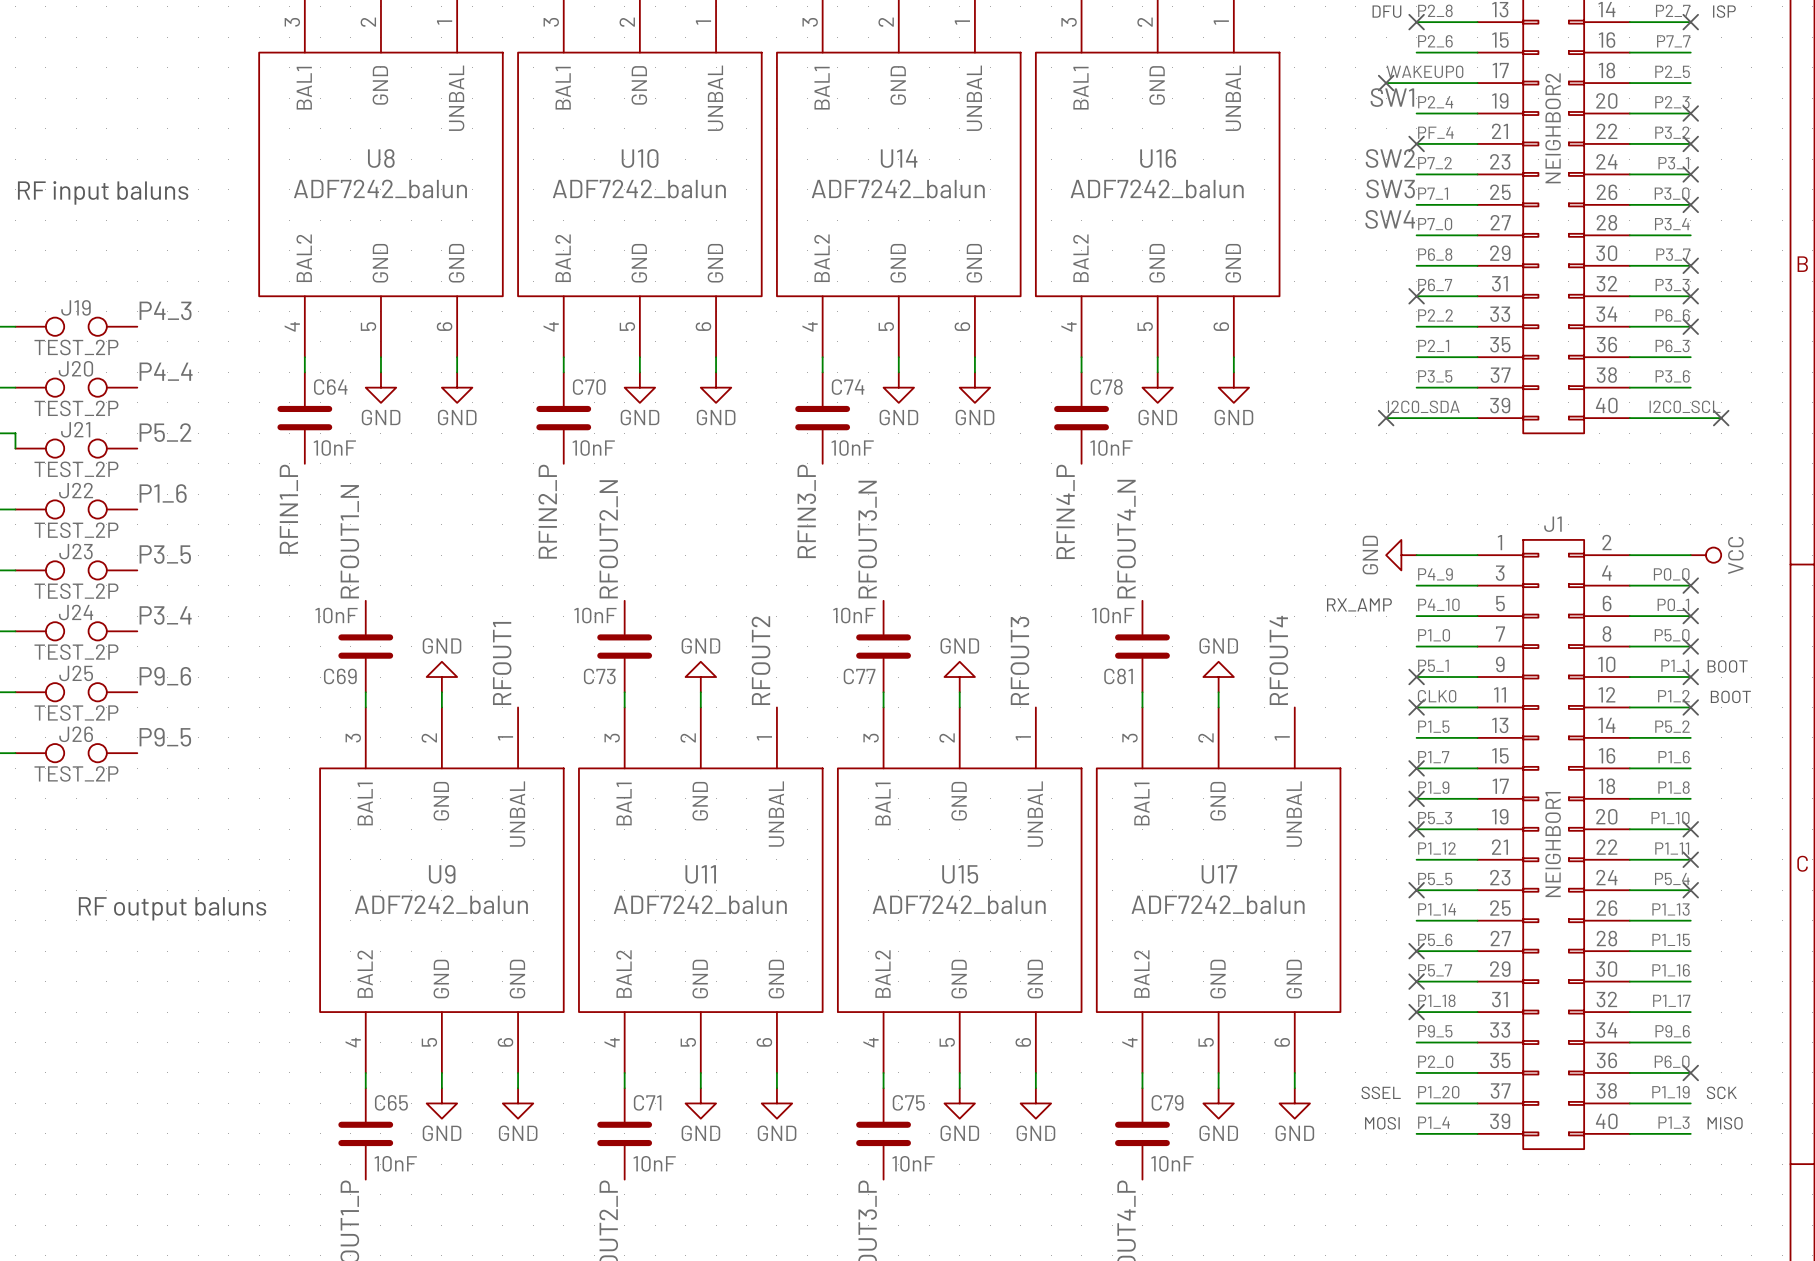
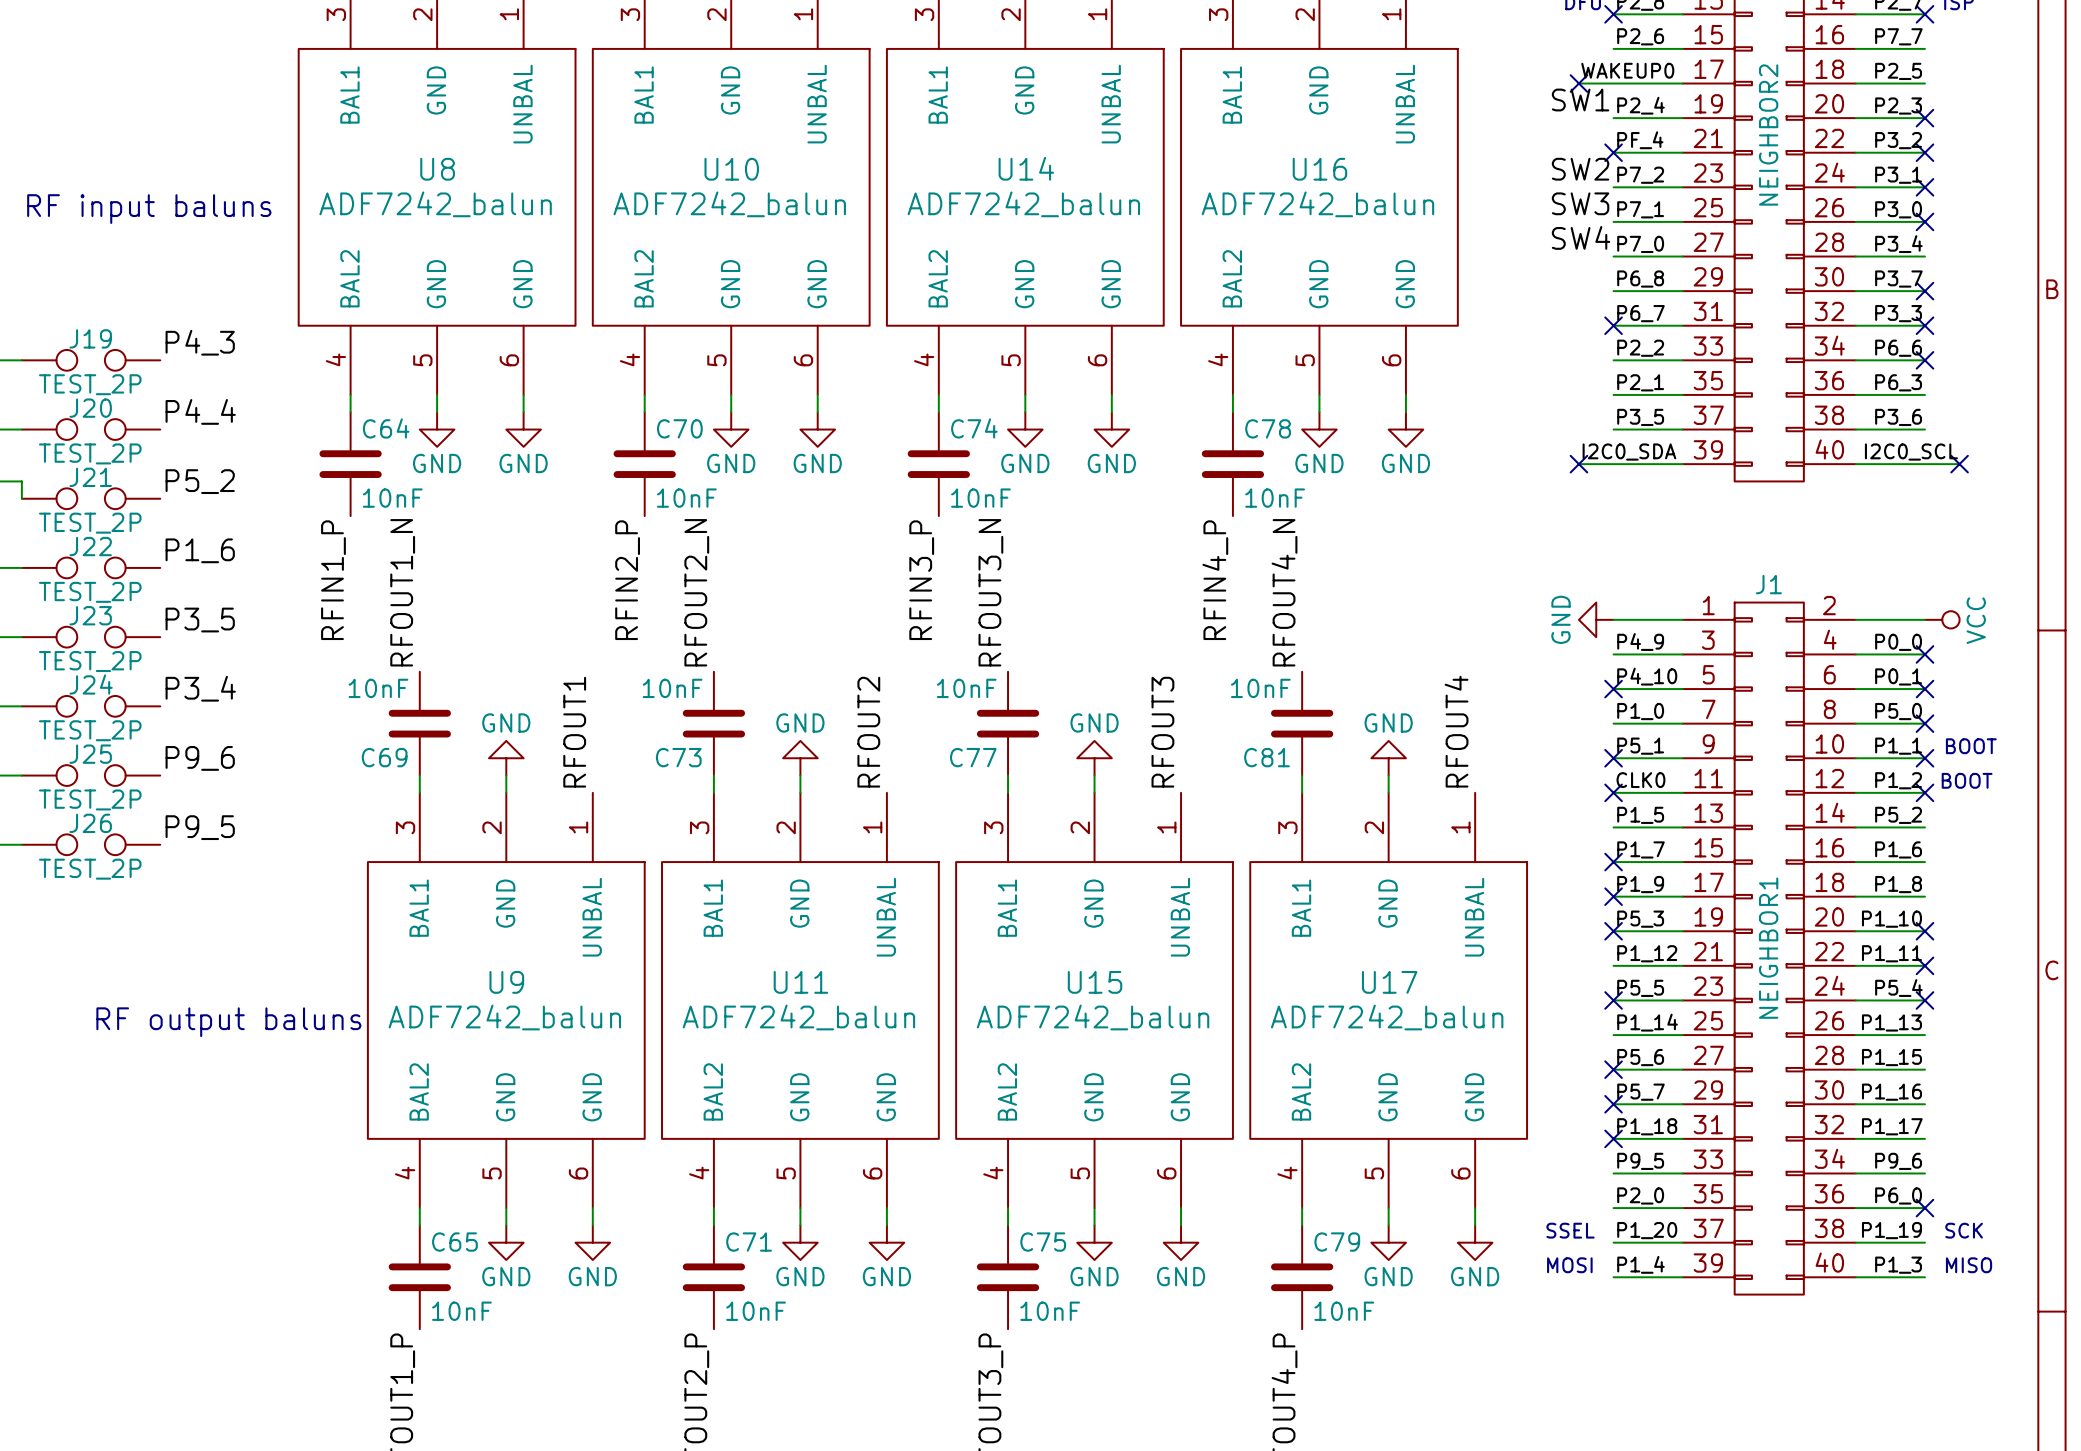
text: RX_AMP (1359, 604) -> none
no-connect mark: none -> (1613, 689)

